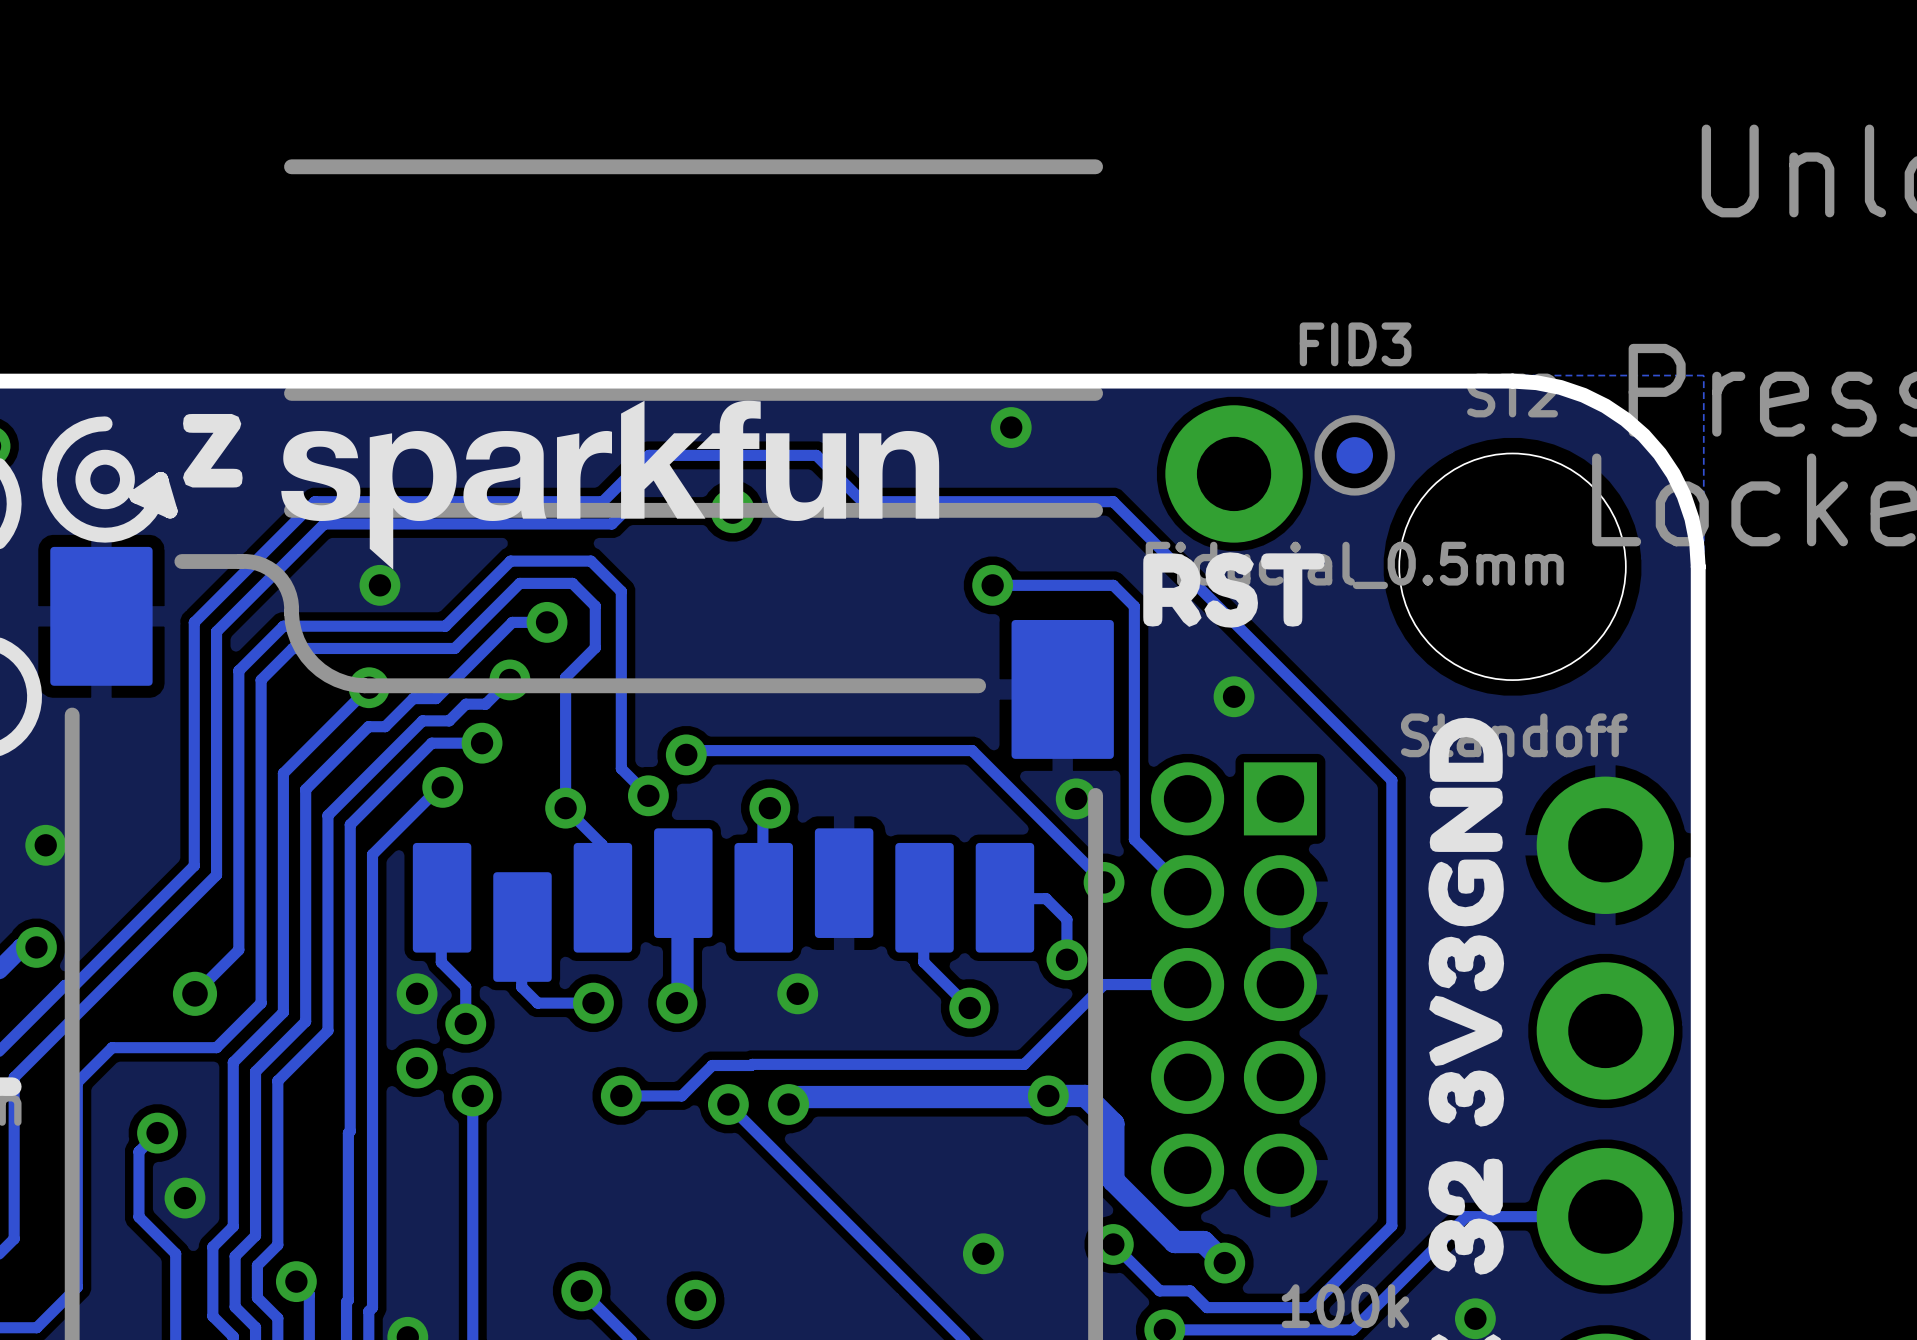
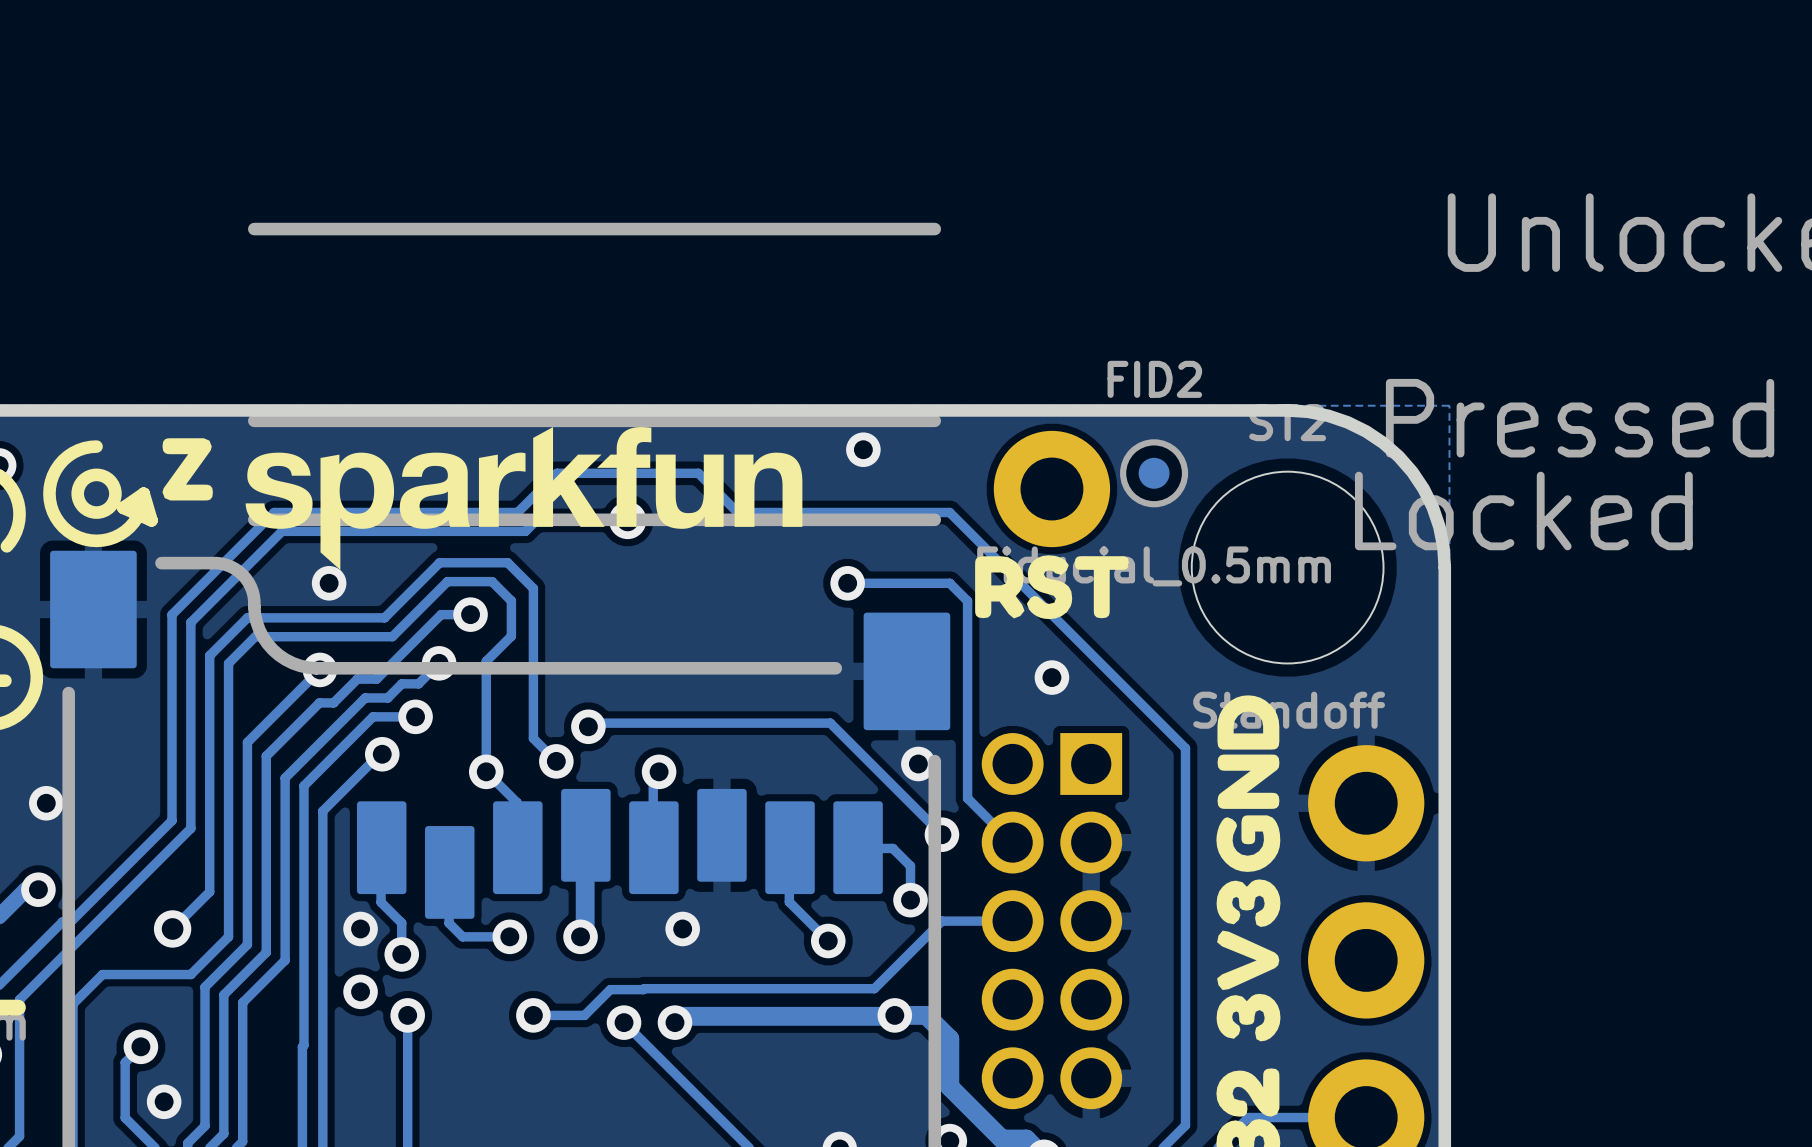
FID3 name: FID3 (1355, 344) -> FID2 (1154, 379)

